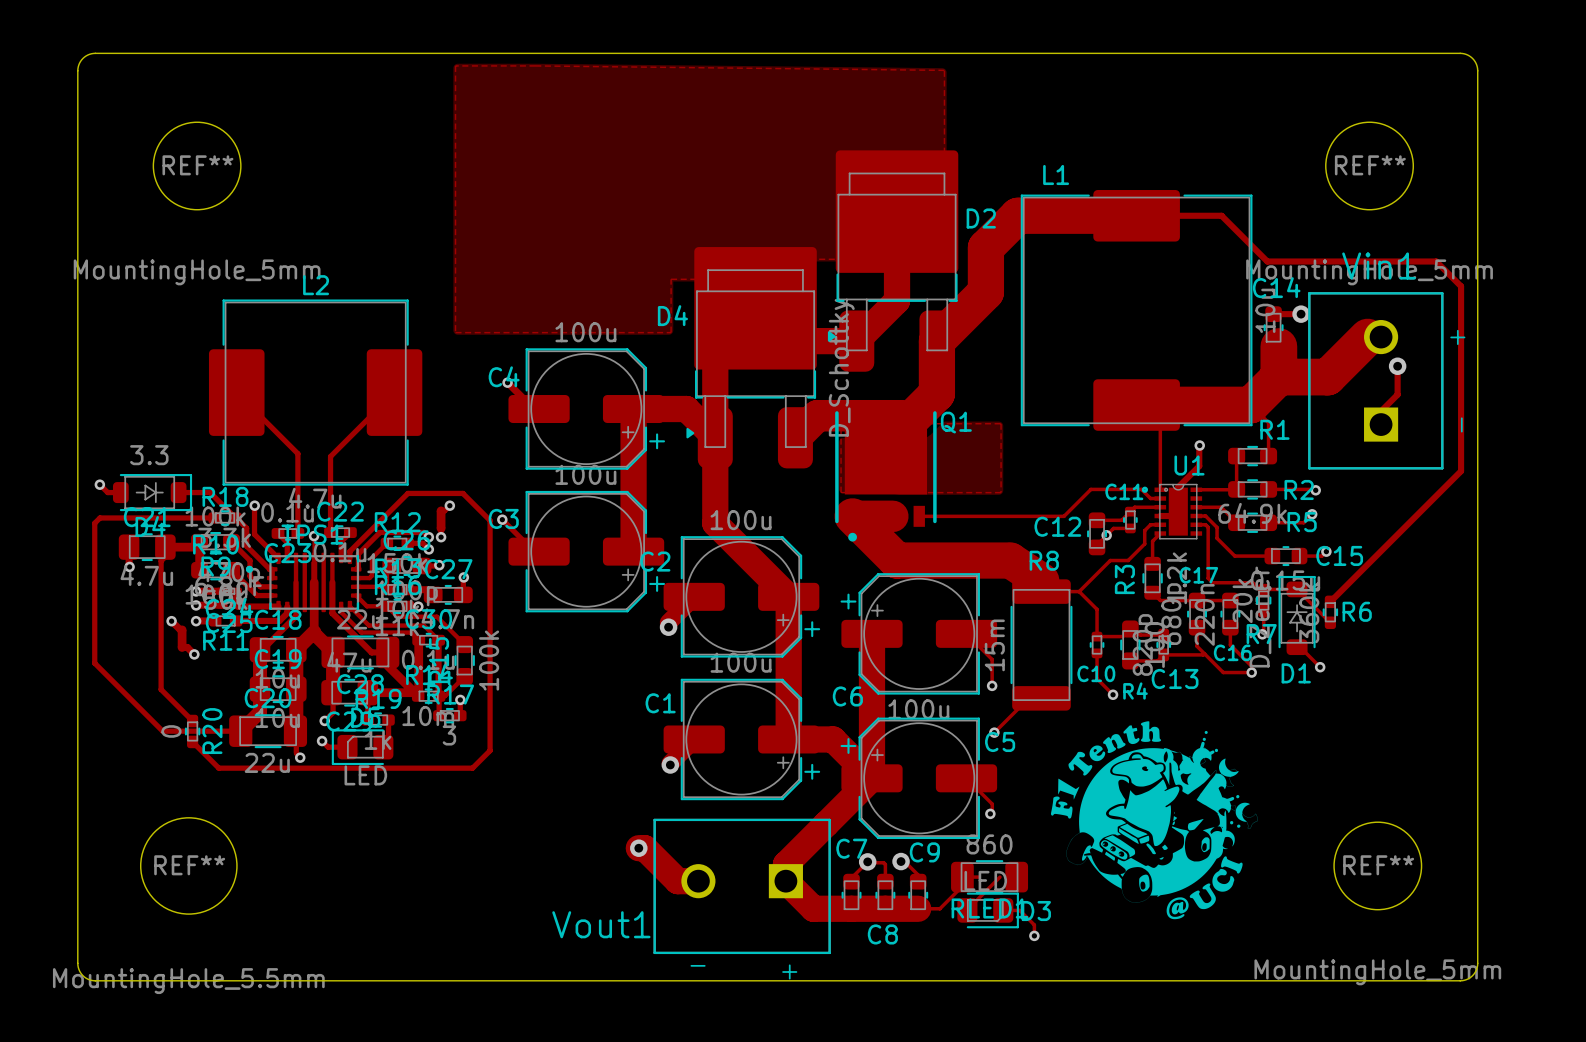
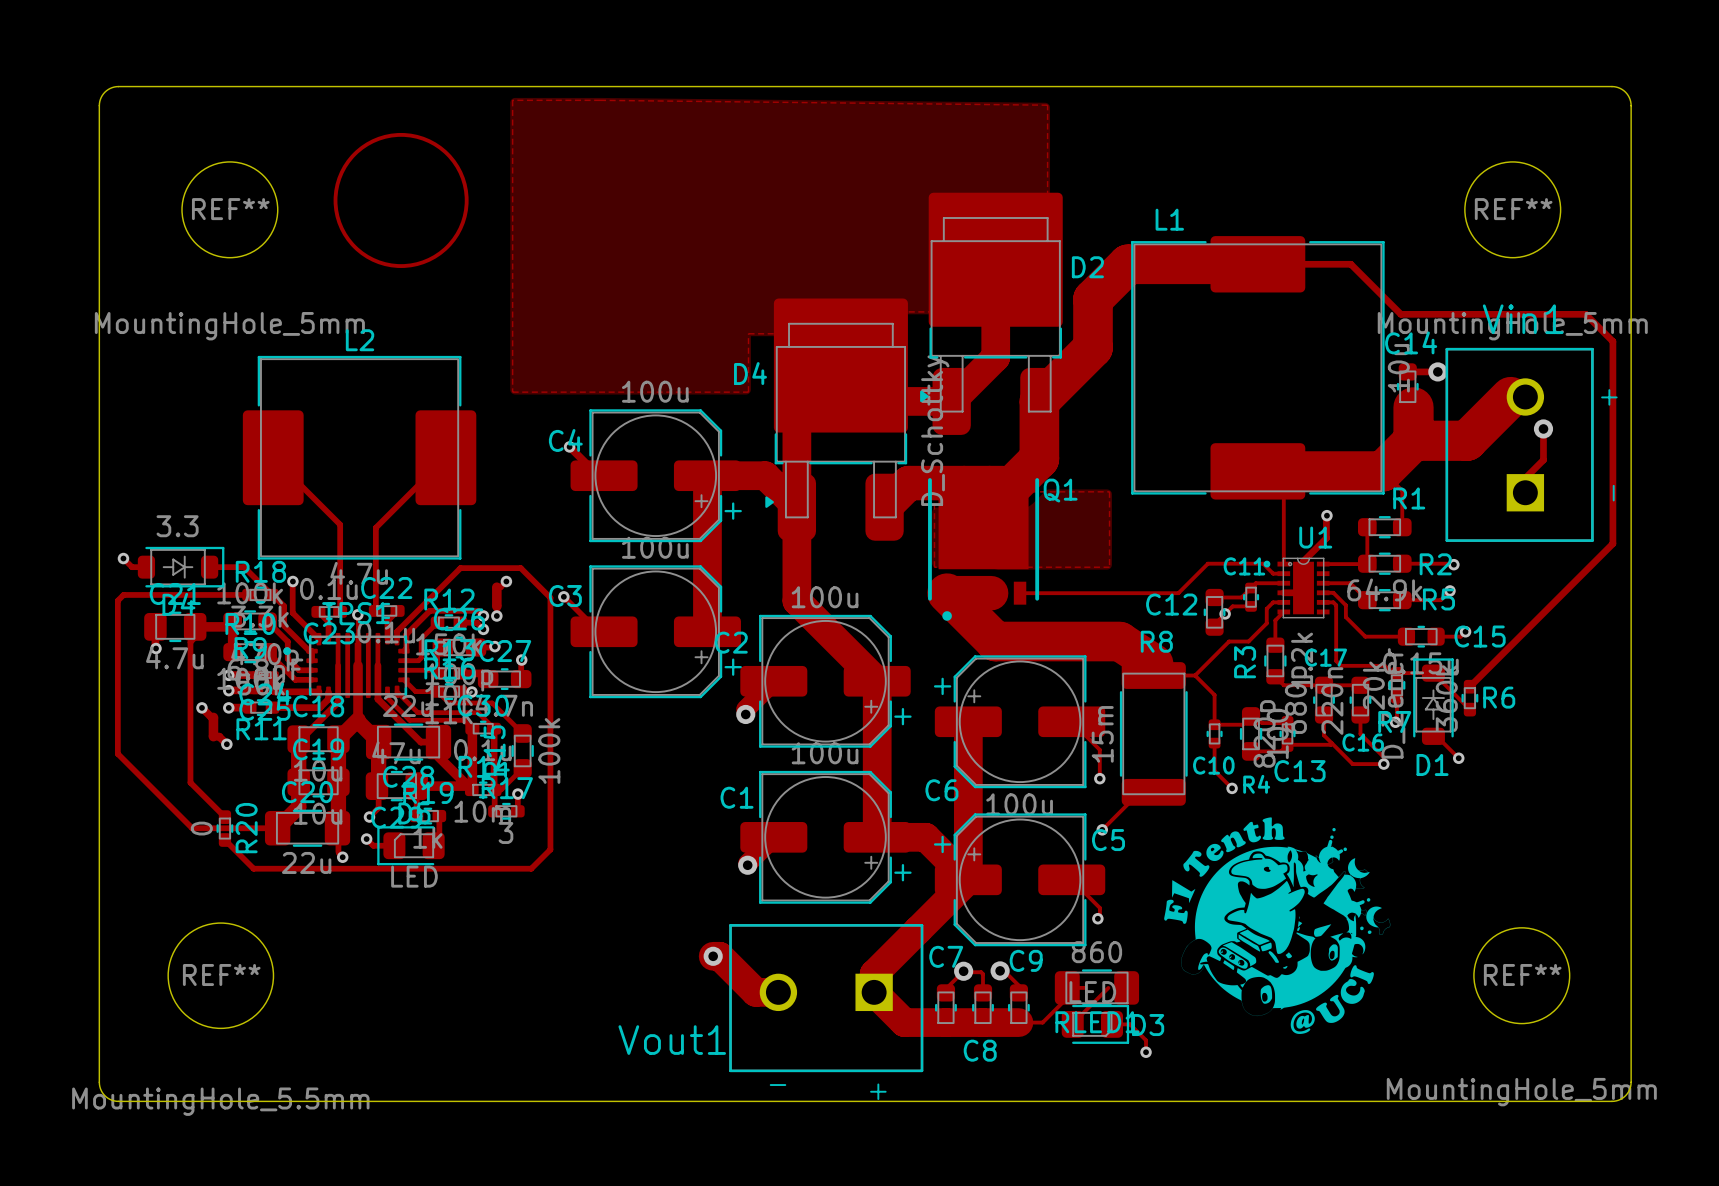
drawing: none -> [333, 132, 469, 268]

